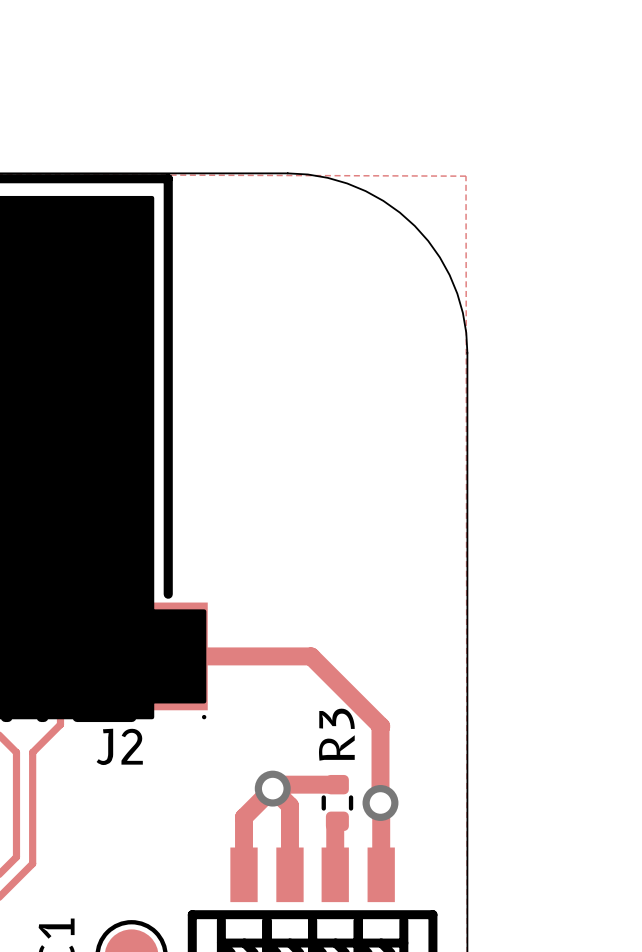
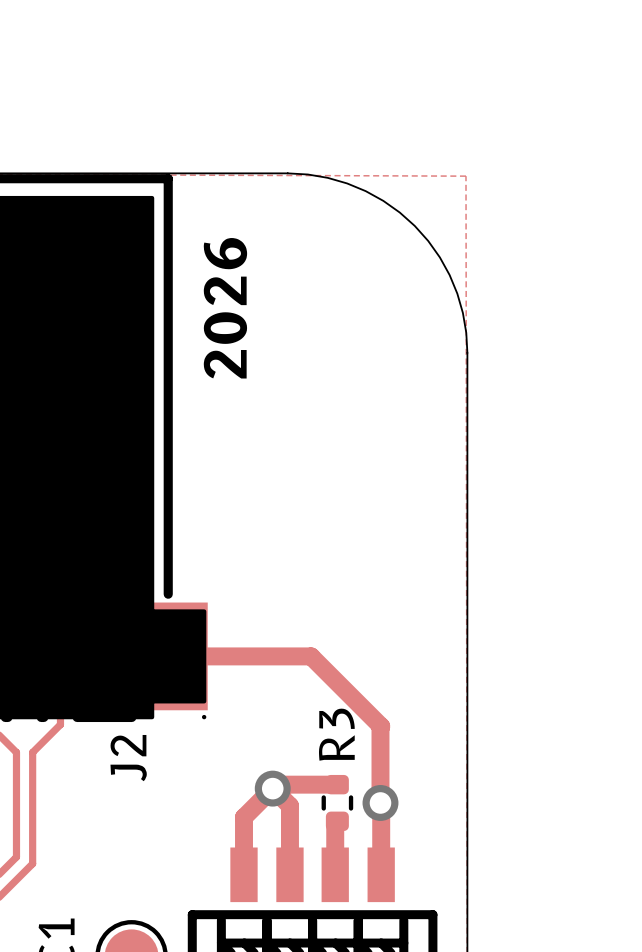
text: none -> 2026 (225, 308)
J2 name rotation: 0° (119, 746) -> 90° counterclockwise (128, 758)

